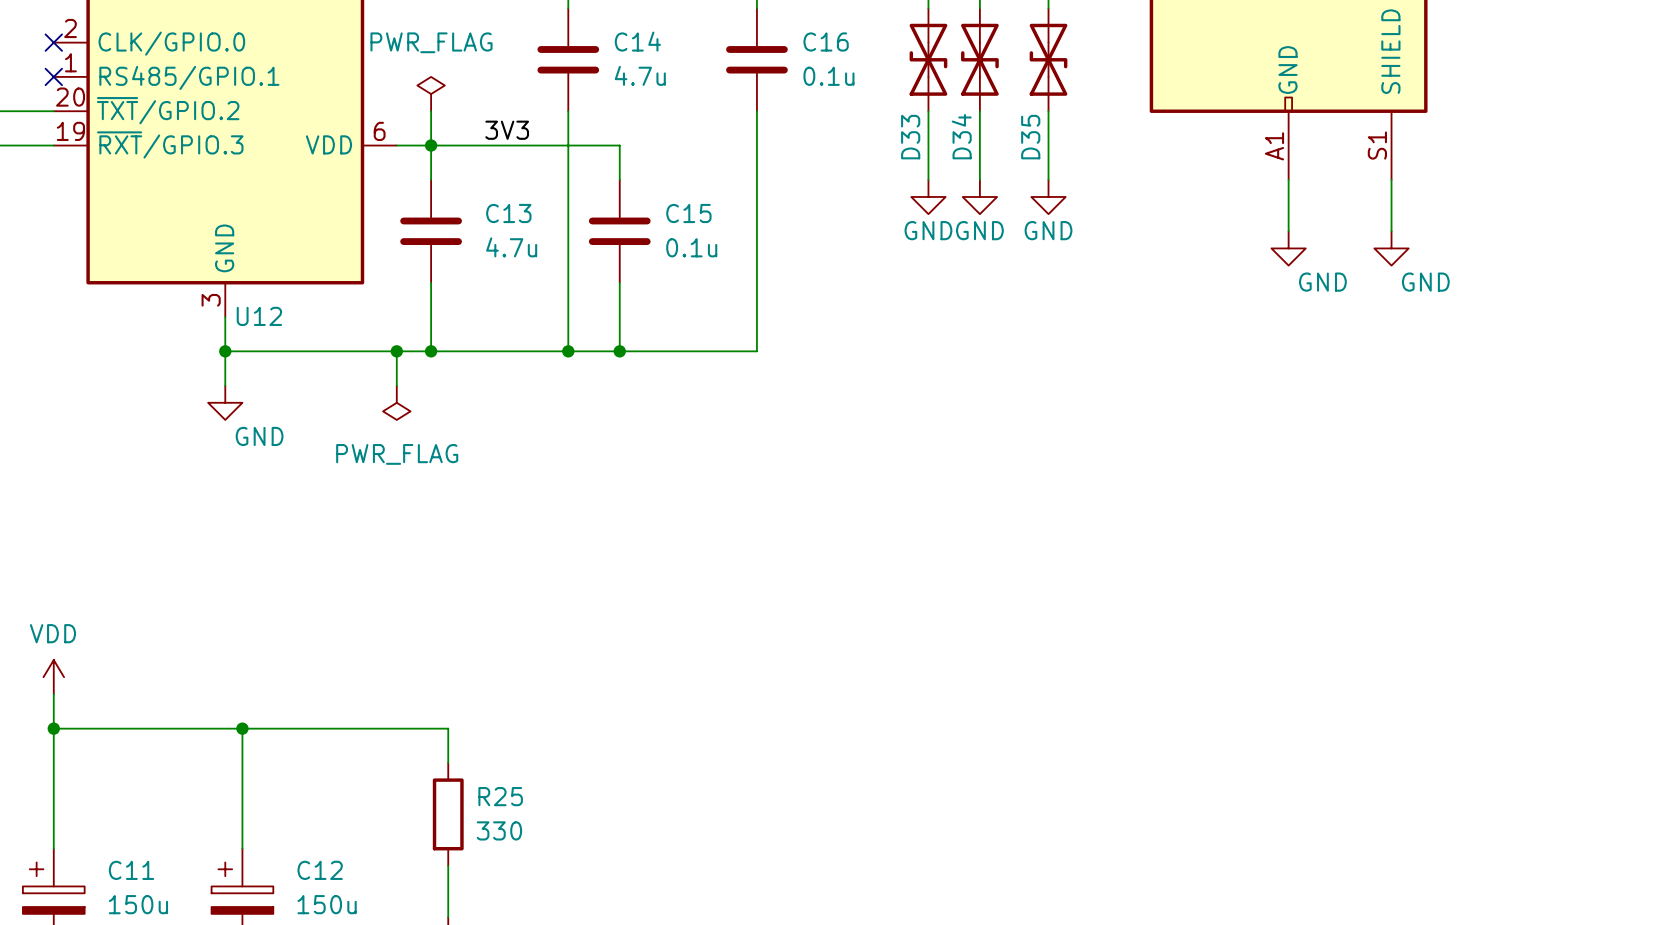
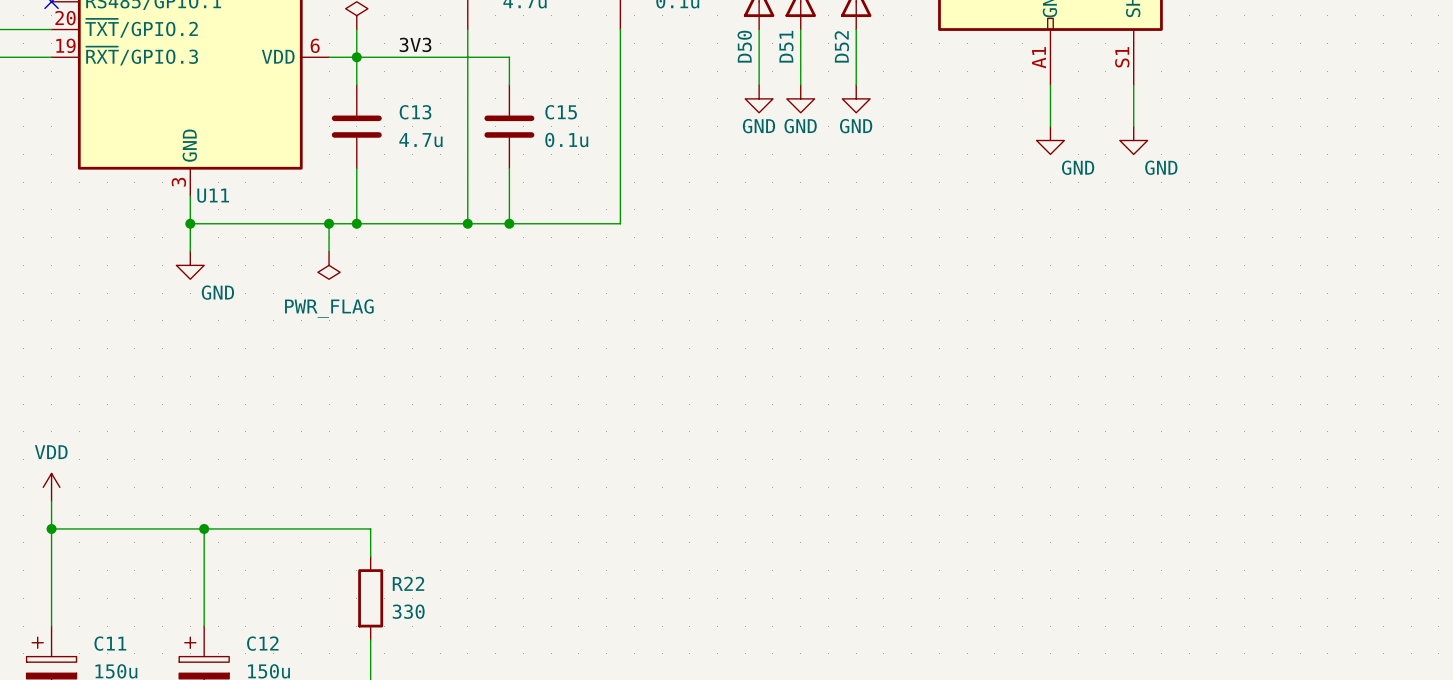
D34 name: D34 (961, 136) -> D51 (786, 46)
D33 name: D33 (910, 137) -> D50 (744, 46)
D35 name: D35 (1030, 137) -> D52 (841, 46)
U12 name: U12 (259, 316) -> U11 (213, 195)
R25 name: R25 (500, 796) -> R22 (408, 583)

